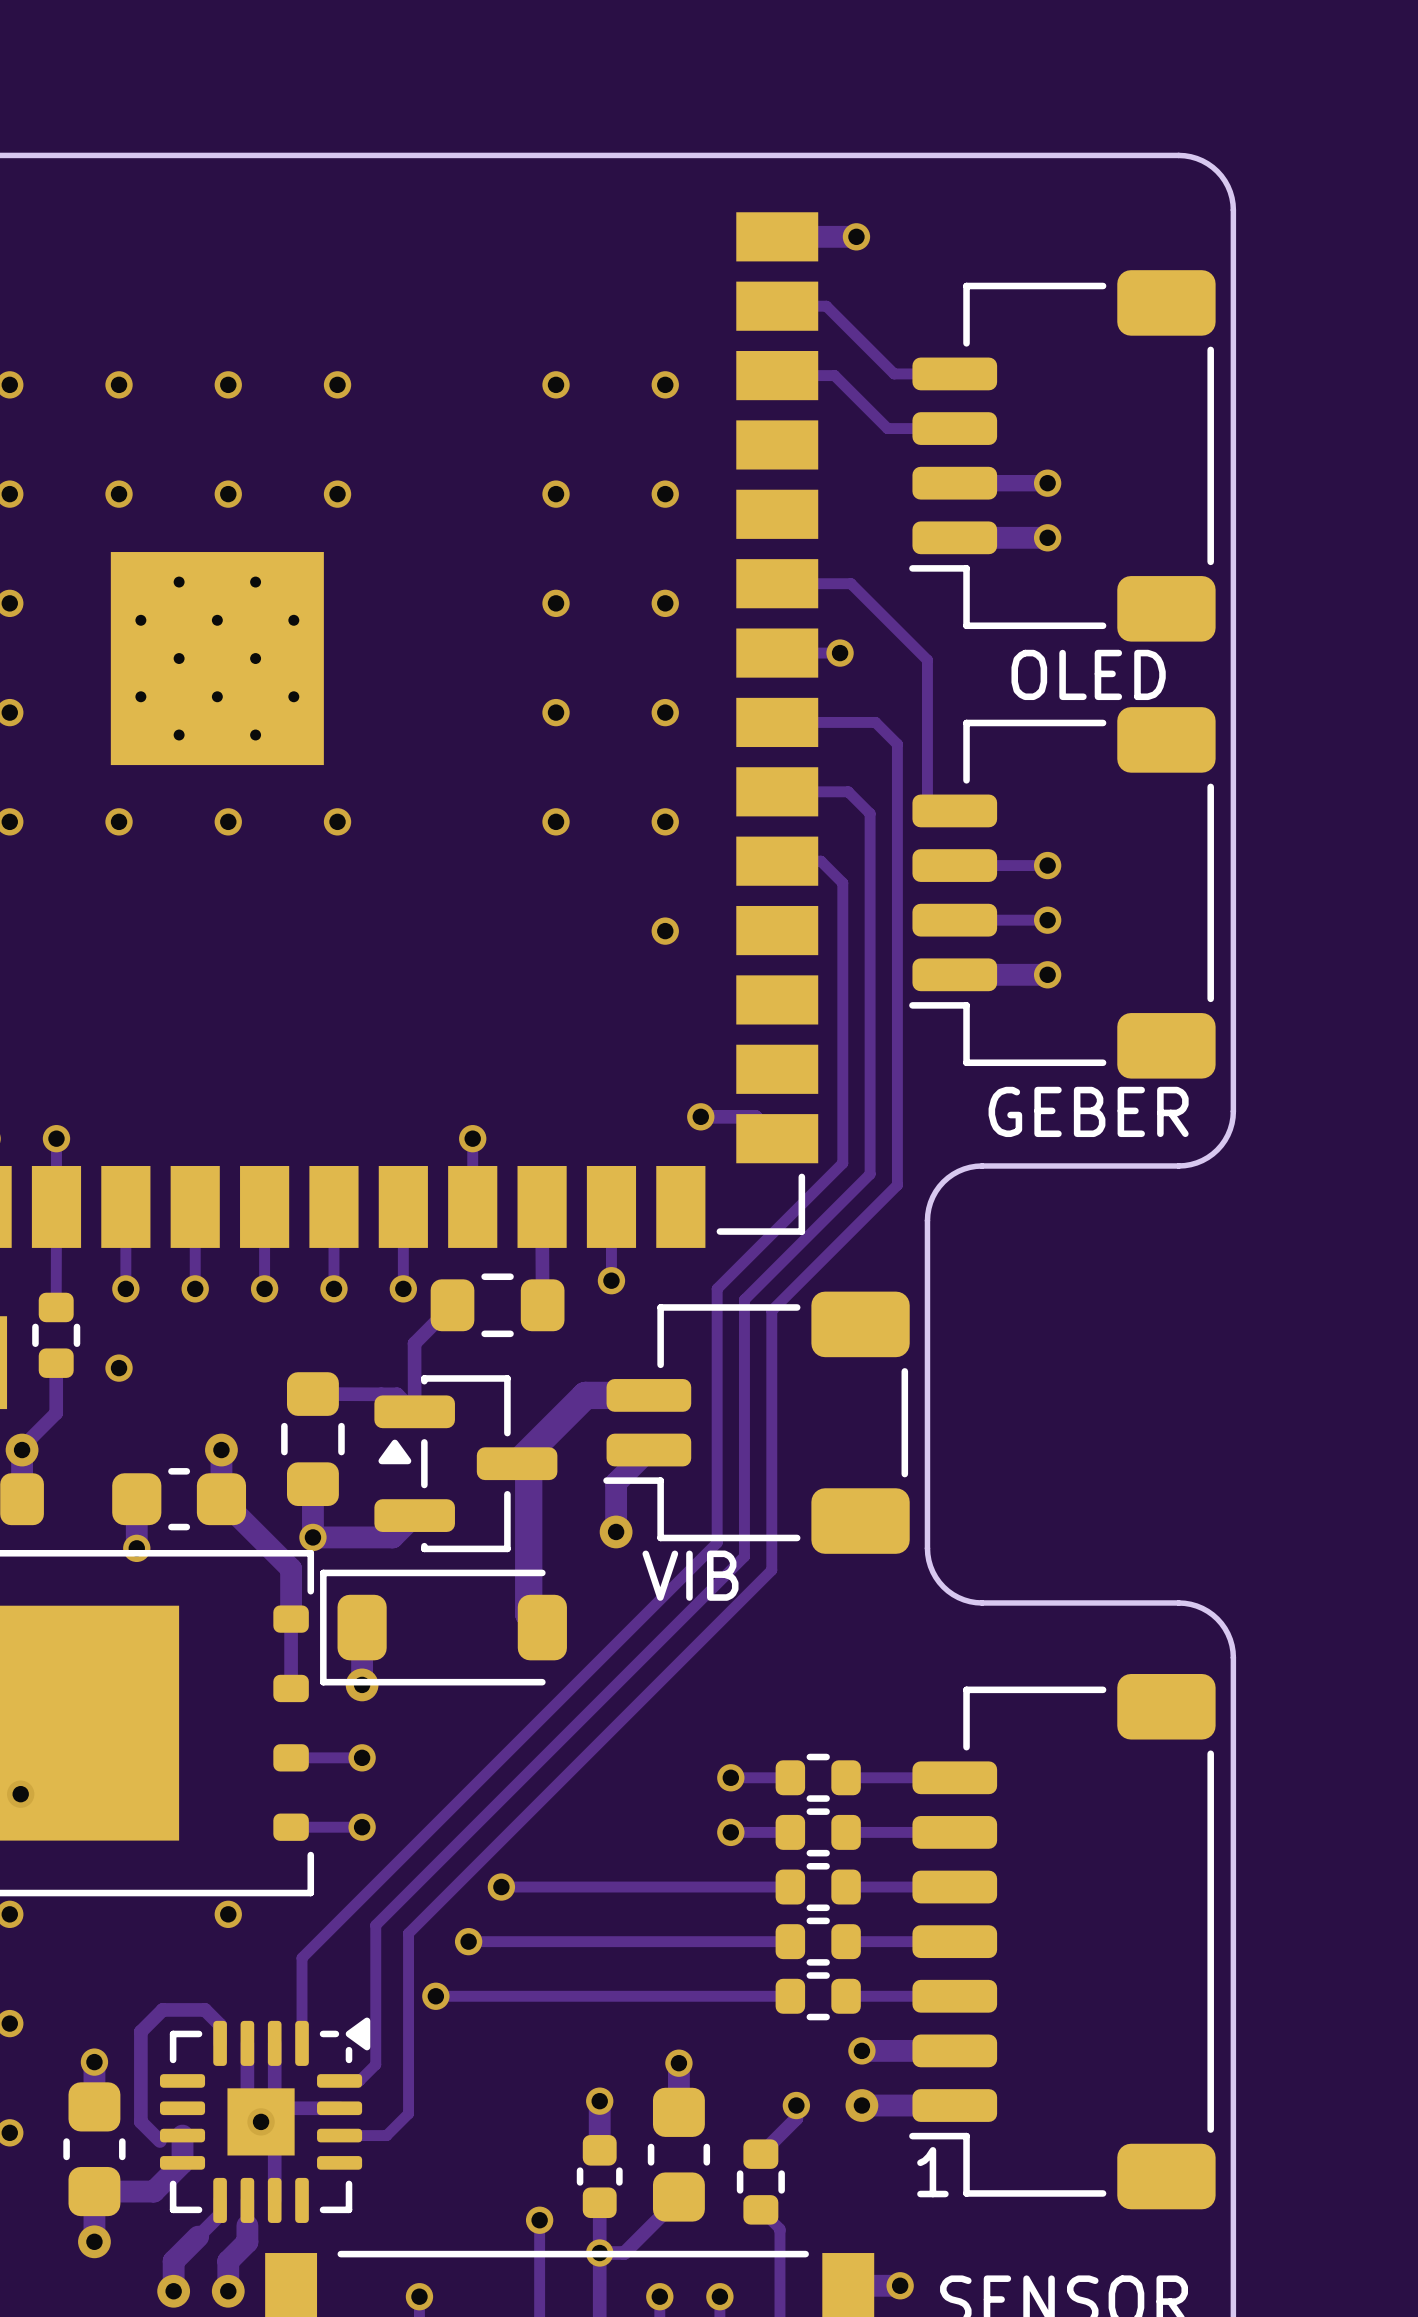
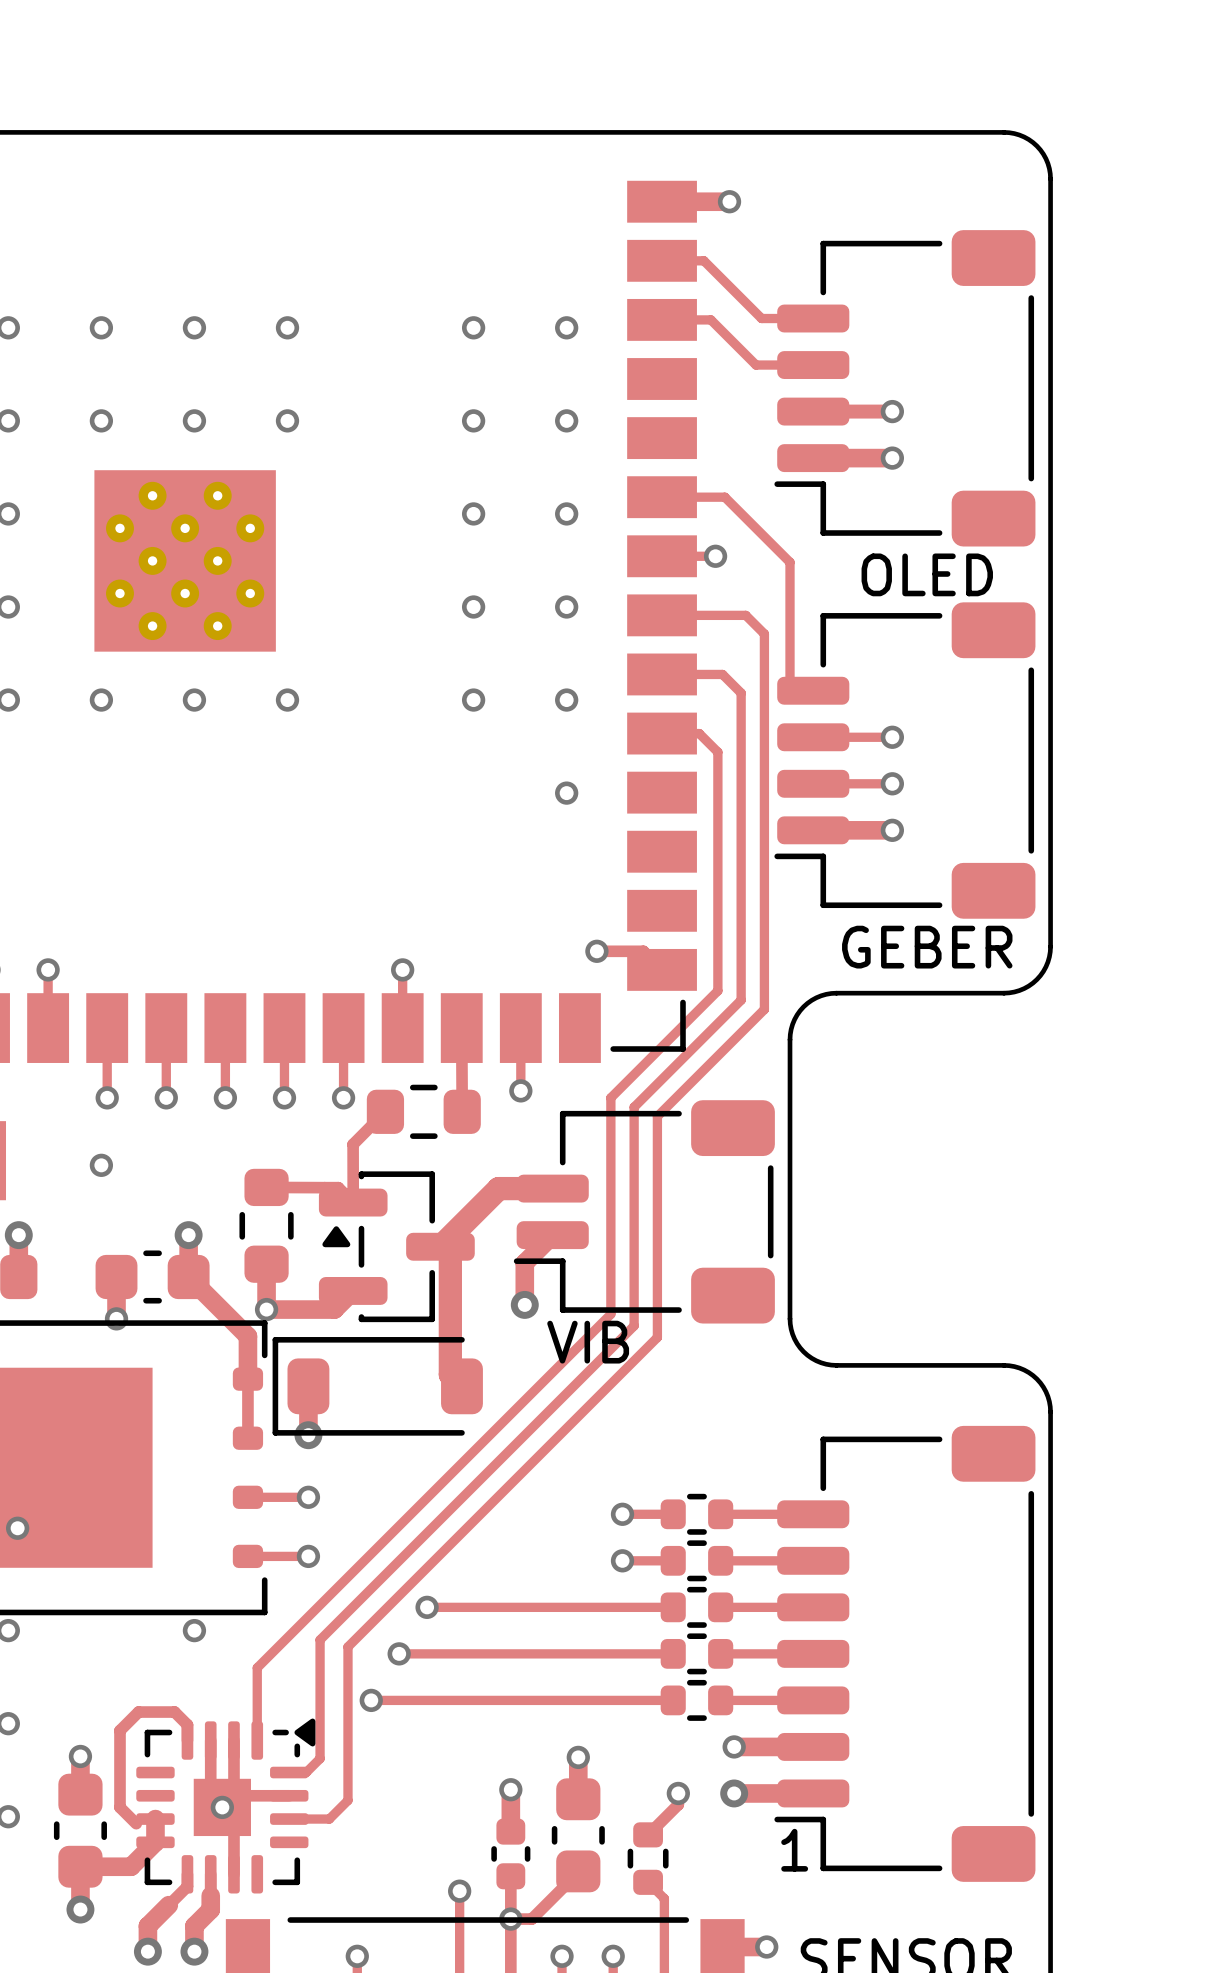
track: (56, 1206) (56, 1307) -> none
part: (56, 1335) -> none
track: (56, 1363) (56, 1413) (19, 1450) -> none

